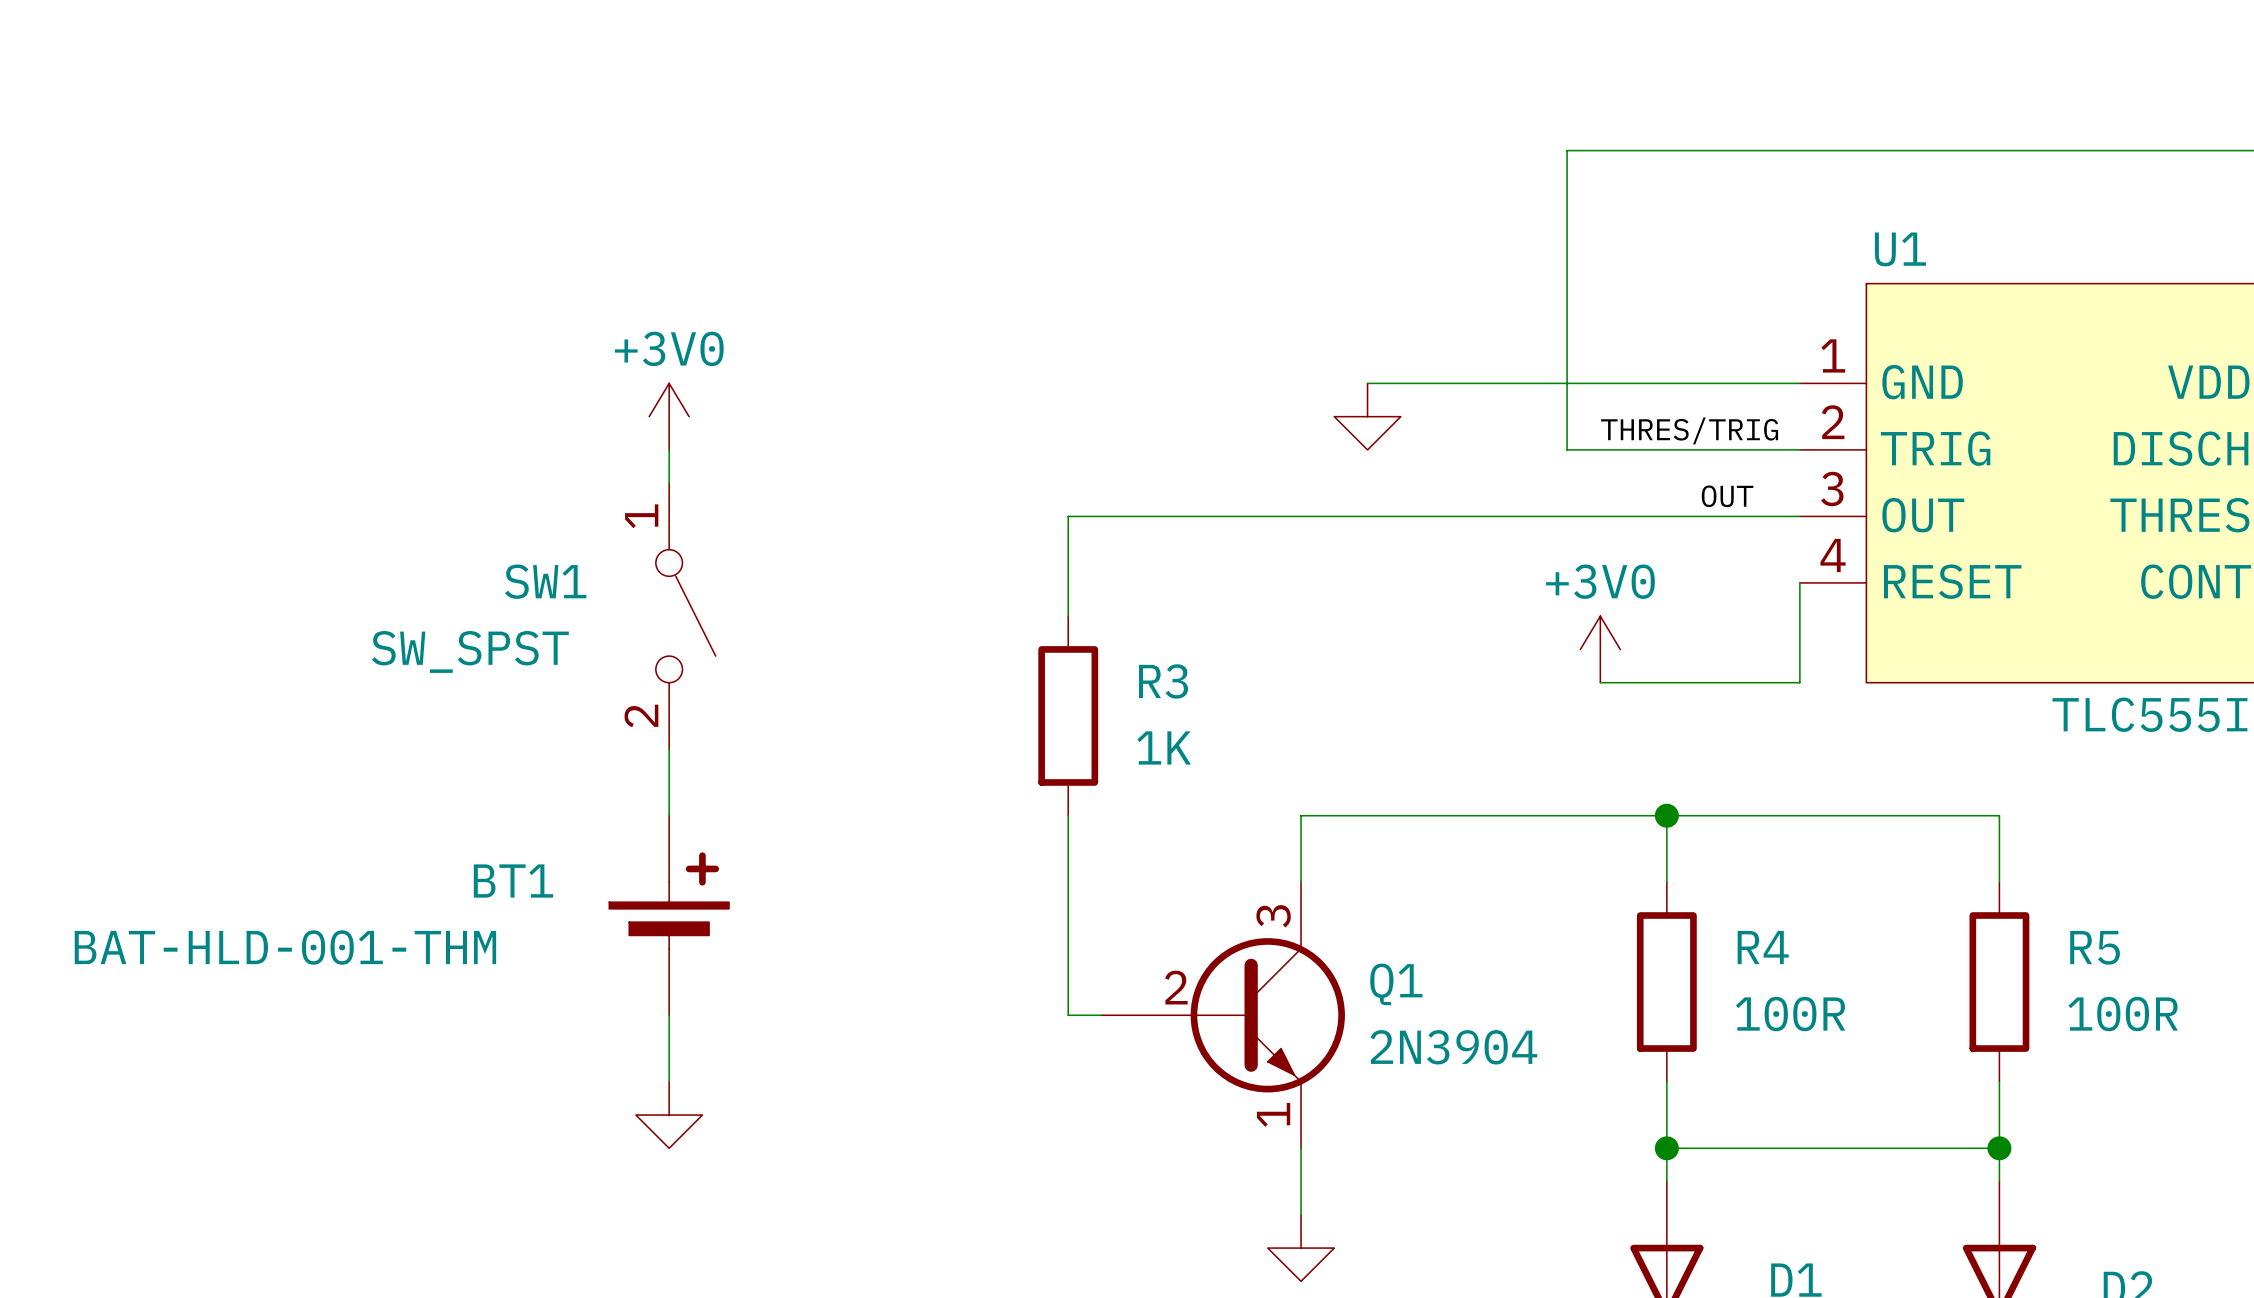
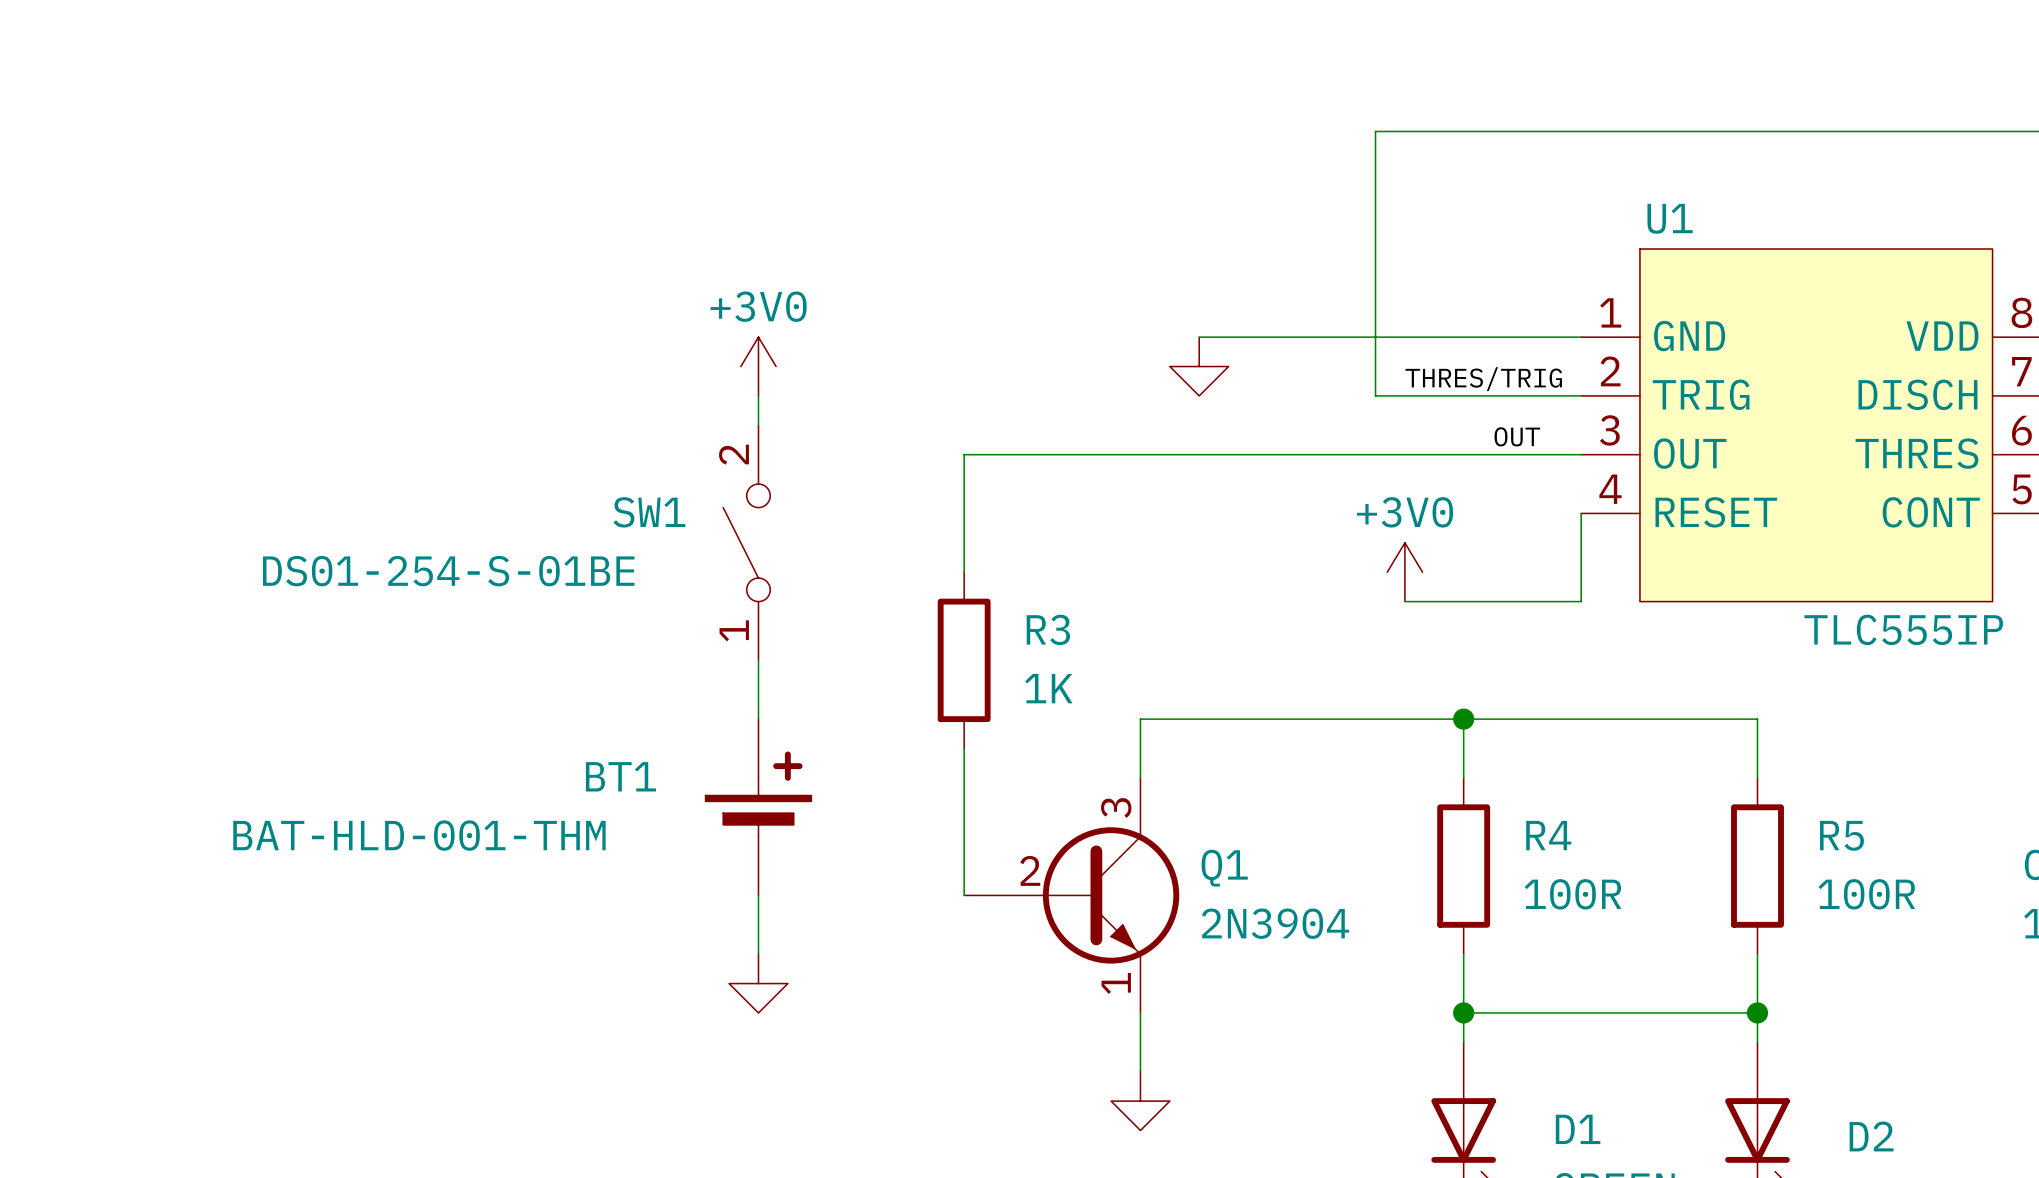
power symbol position: +3V0 (669, 416) -> +3V0 (758, 366)
wire: (669, 449) (669, 483) -> (758, 395) (758, 425)
SW1 symbol: [655, 483, 716, 750] -> [723, 425, 771, 661]
wire: (1101, 516) (1068, 516) (1068, 616) -> (964, 454) (964, 572)
SW1 value: SW_SPST (470, 651) -> DS01-254-S-01BE (448, 571)
R3 position: (1068, 715) -> (964, 660)
wire: (669, 749) (669, 815) -> (758, 660) (758, 719)
wire: (1068, 815) (1068, 1015) (1101, 1015) -> (964, 748) (964, 895)
BT1 position: (669, 915) -> (758, 807)
wire: (669, 1015) (669, 1081) -> (758, 895) (758, 954)
power symbol position: (669, 1115) -> (758, 983)

